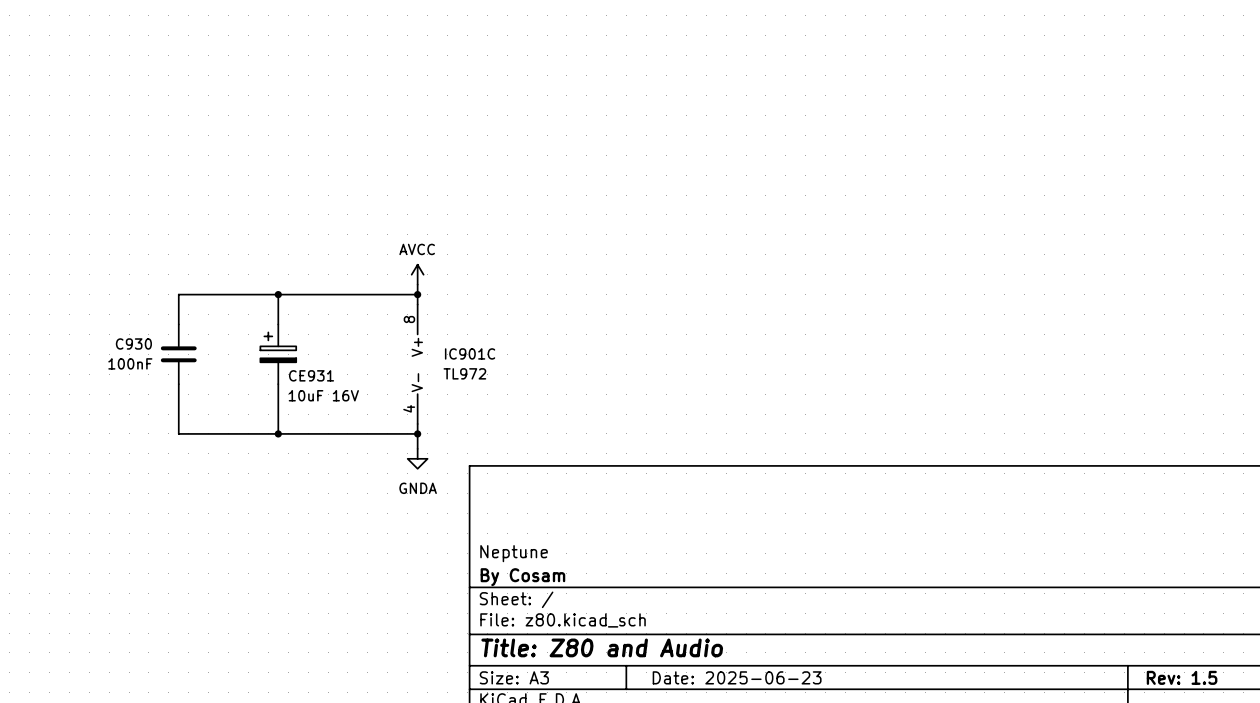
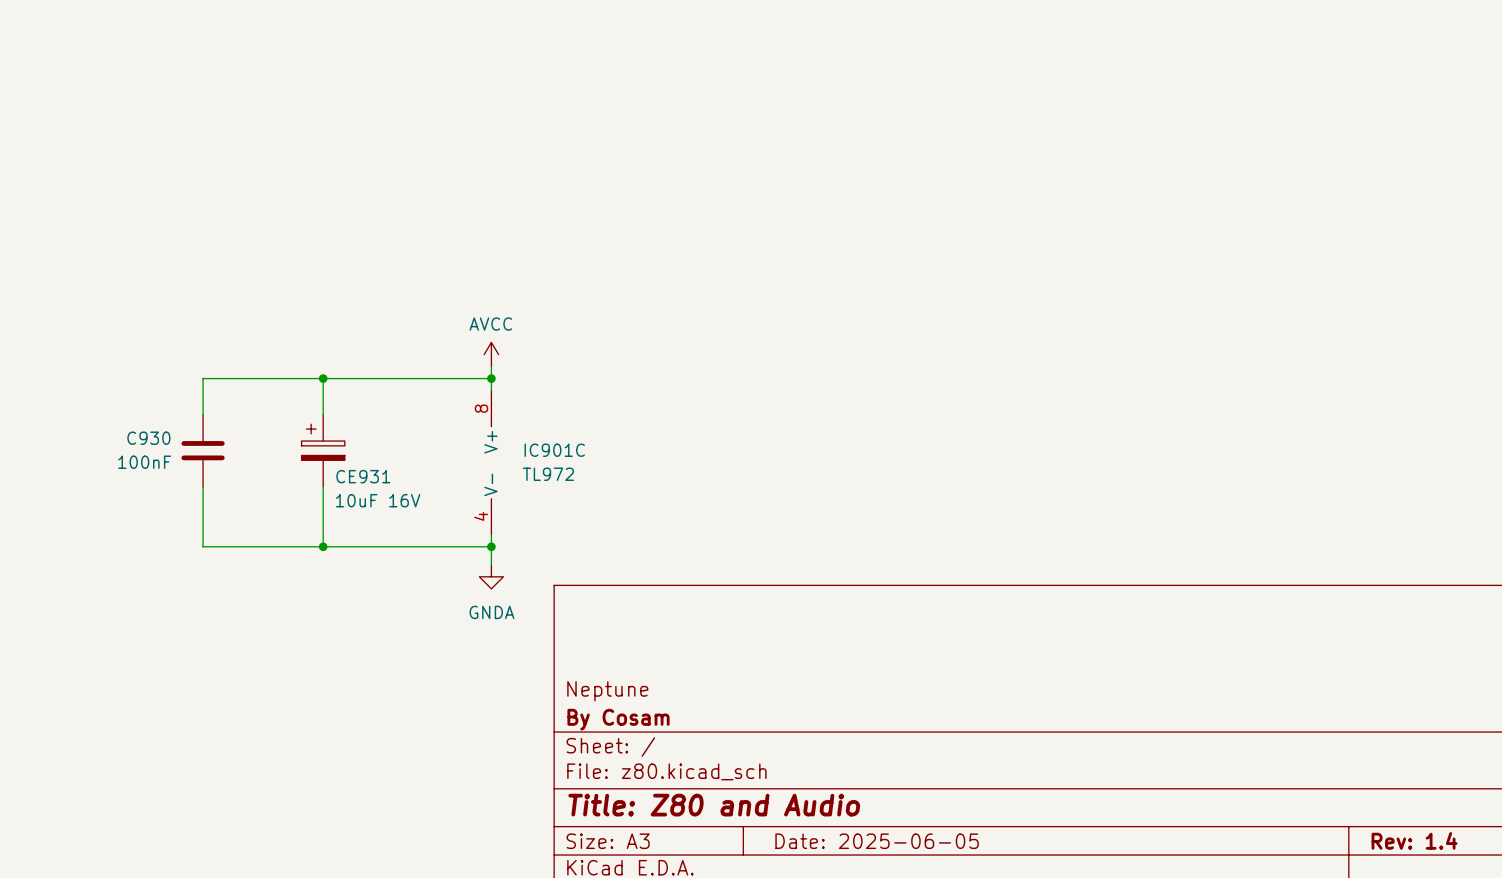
title block: Date: 2025-06-23 (737, 677) -> Date: 2025-06-05 (877, 841)
title block: Rev: 1.5 (1182, 677) -> Rev: 1.4 (1414, 840)

